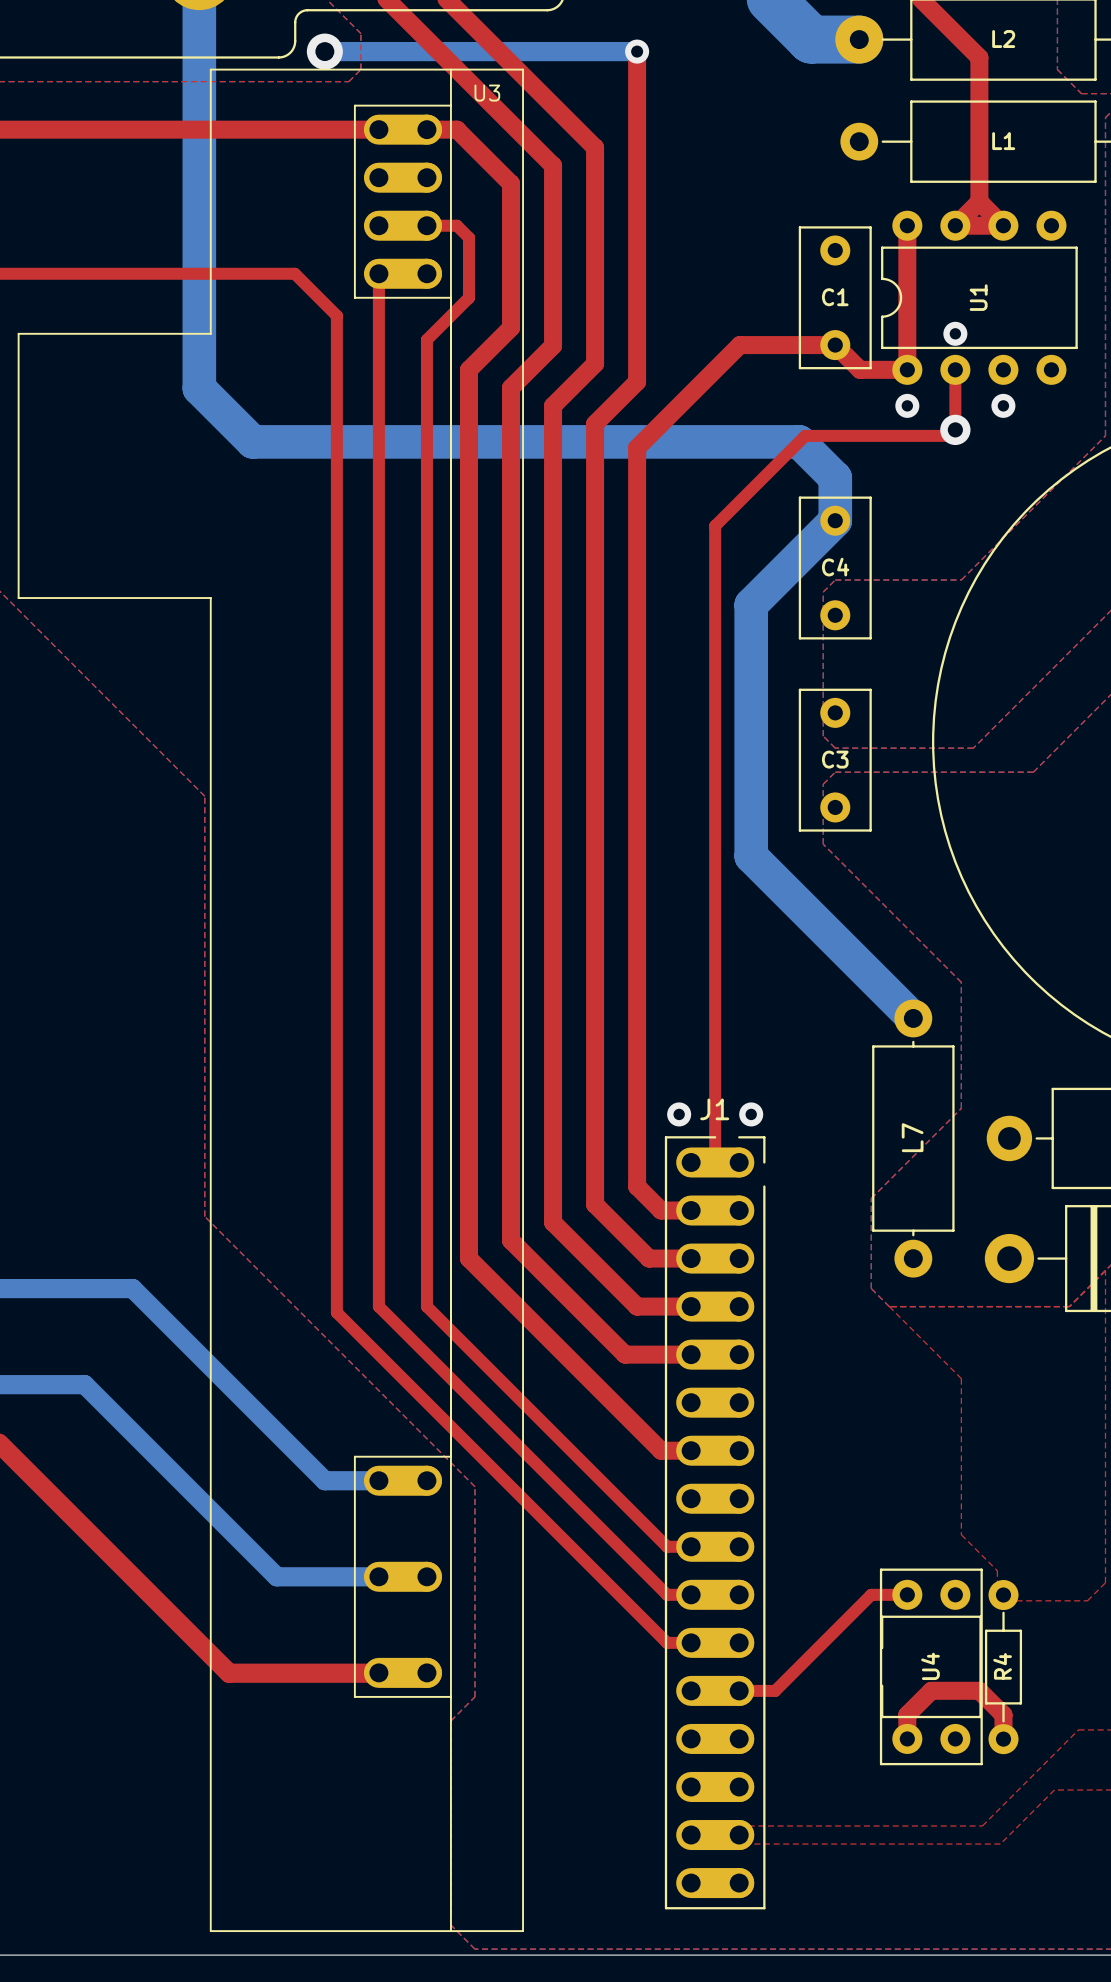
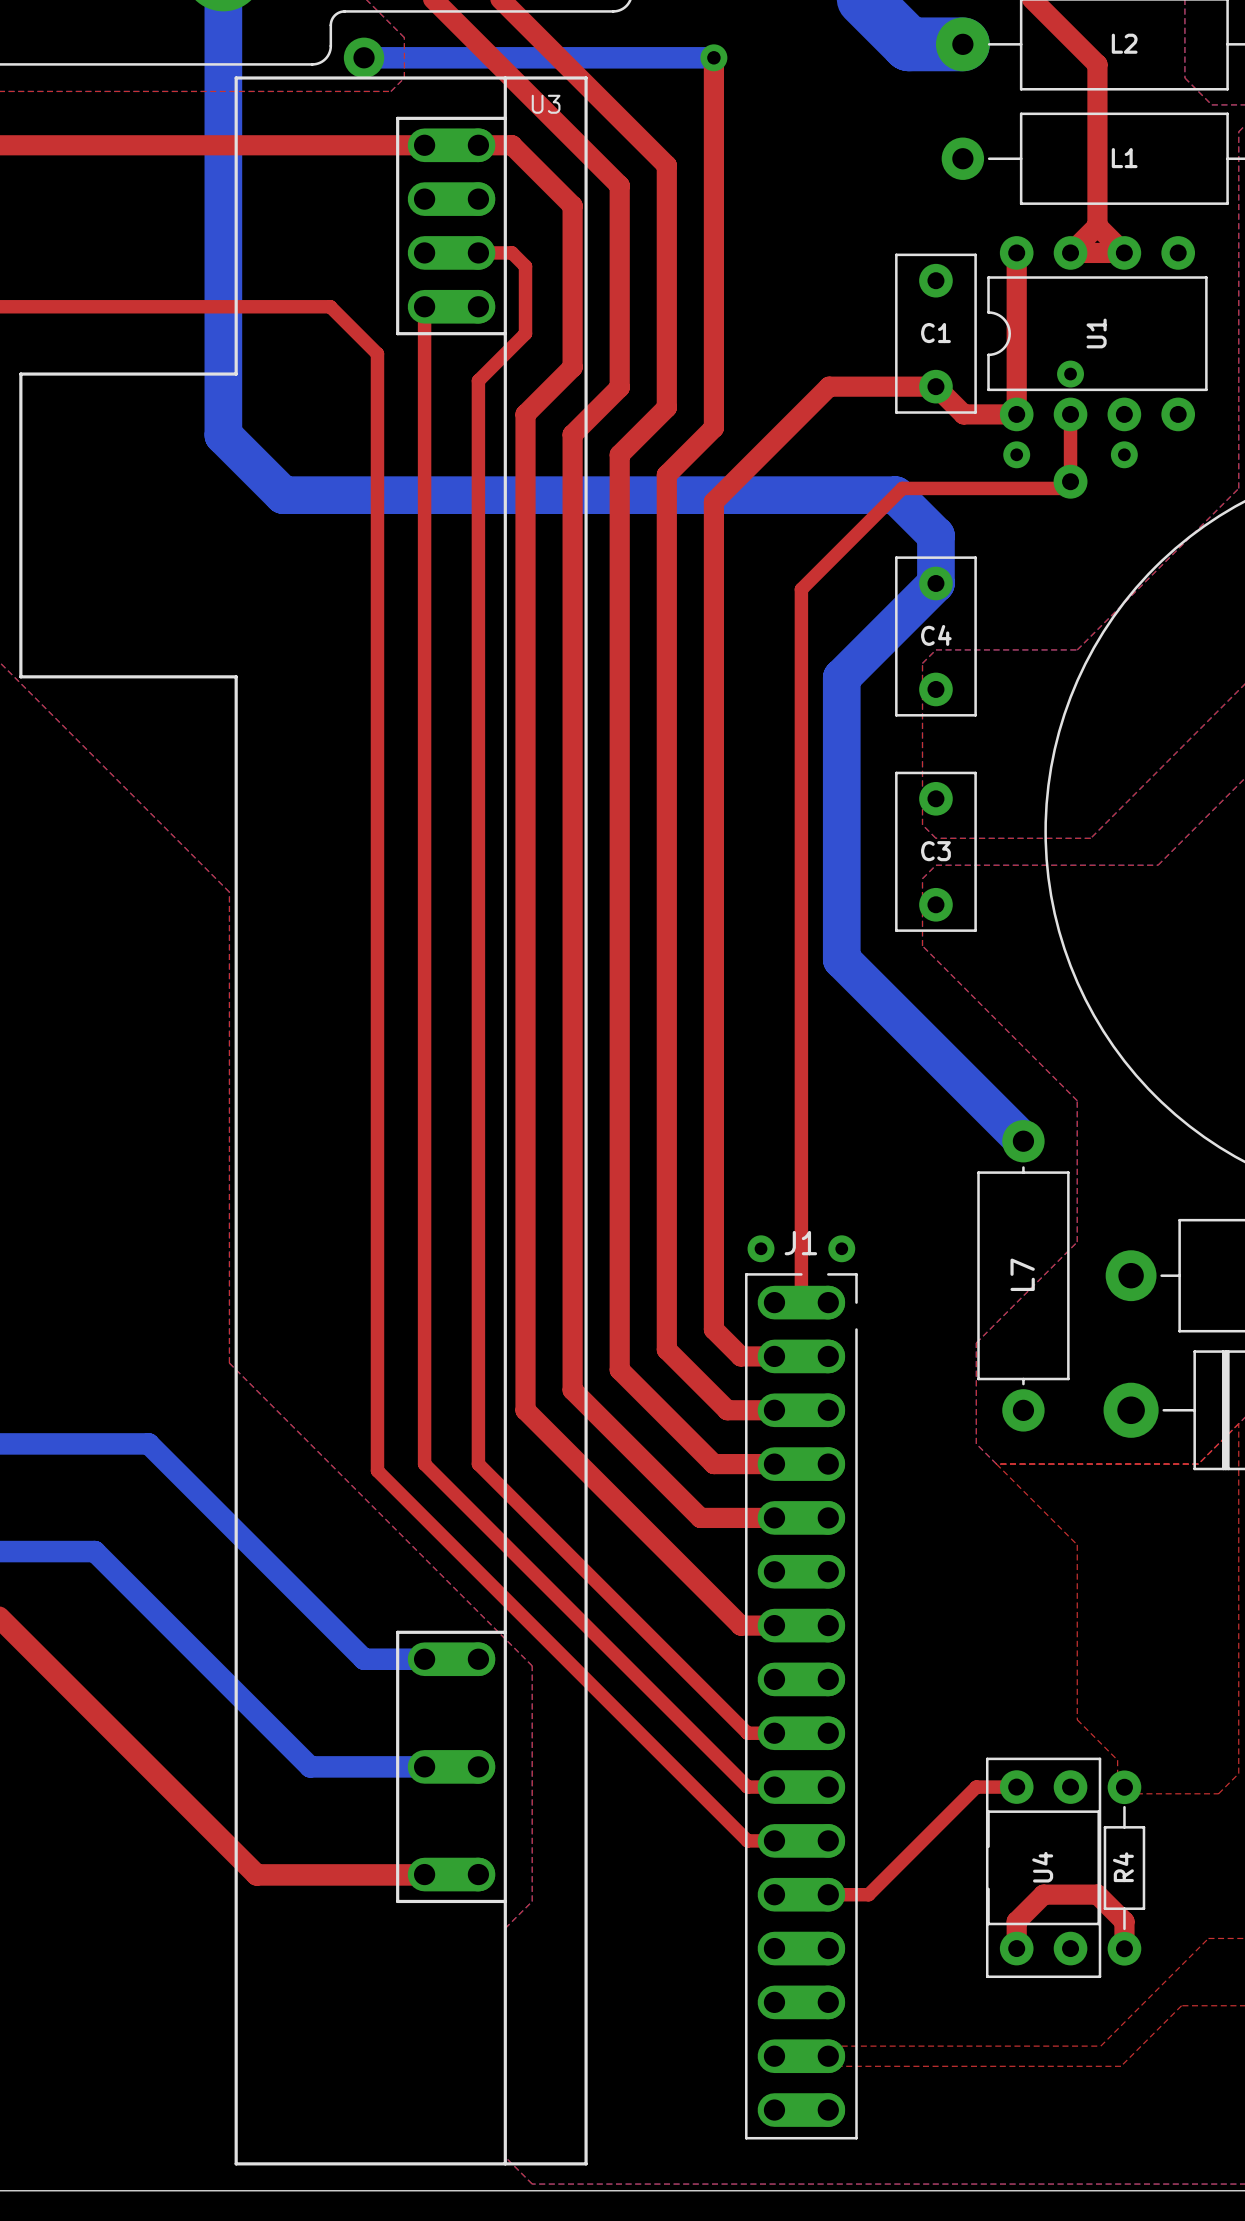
U3 footprint: [17, 68, 524, 1933] -> [19, 76, 588, 2166]

